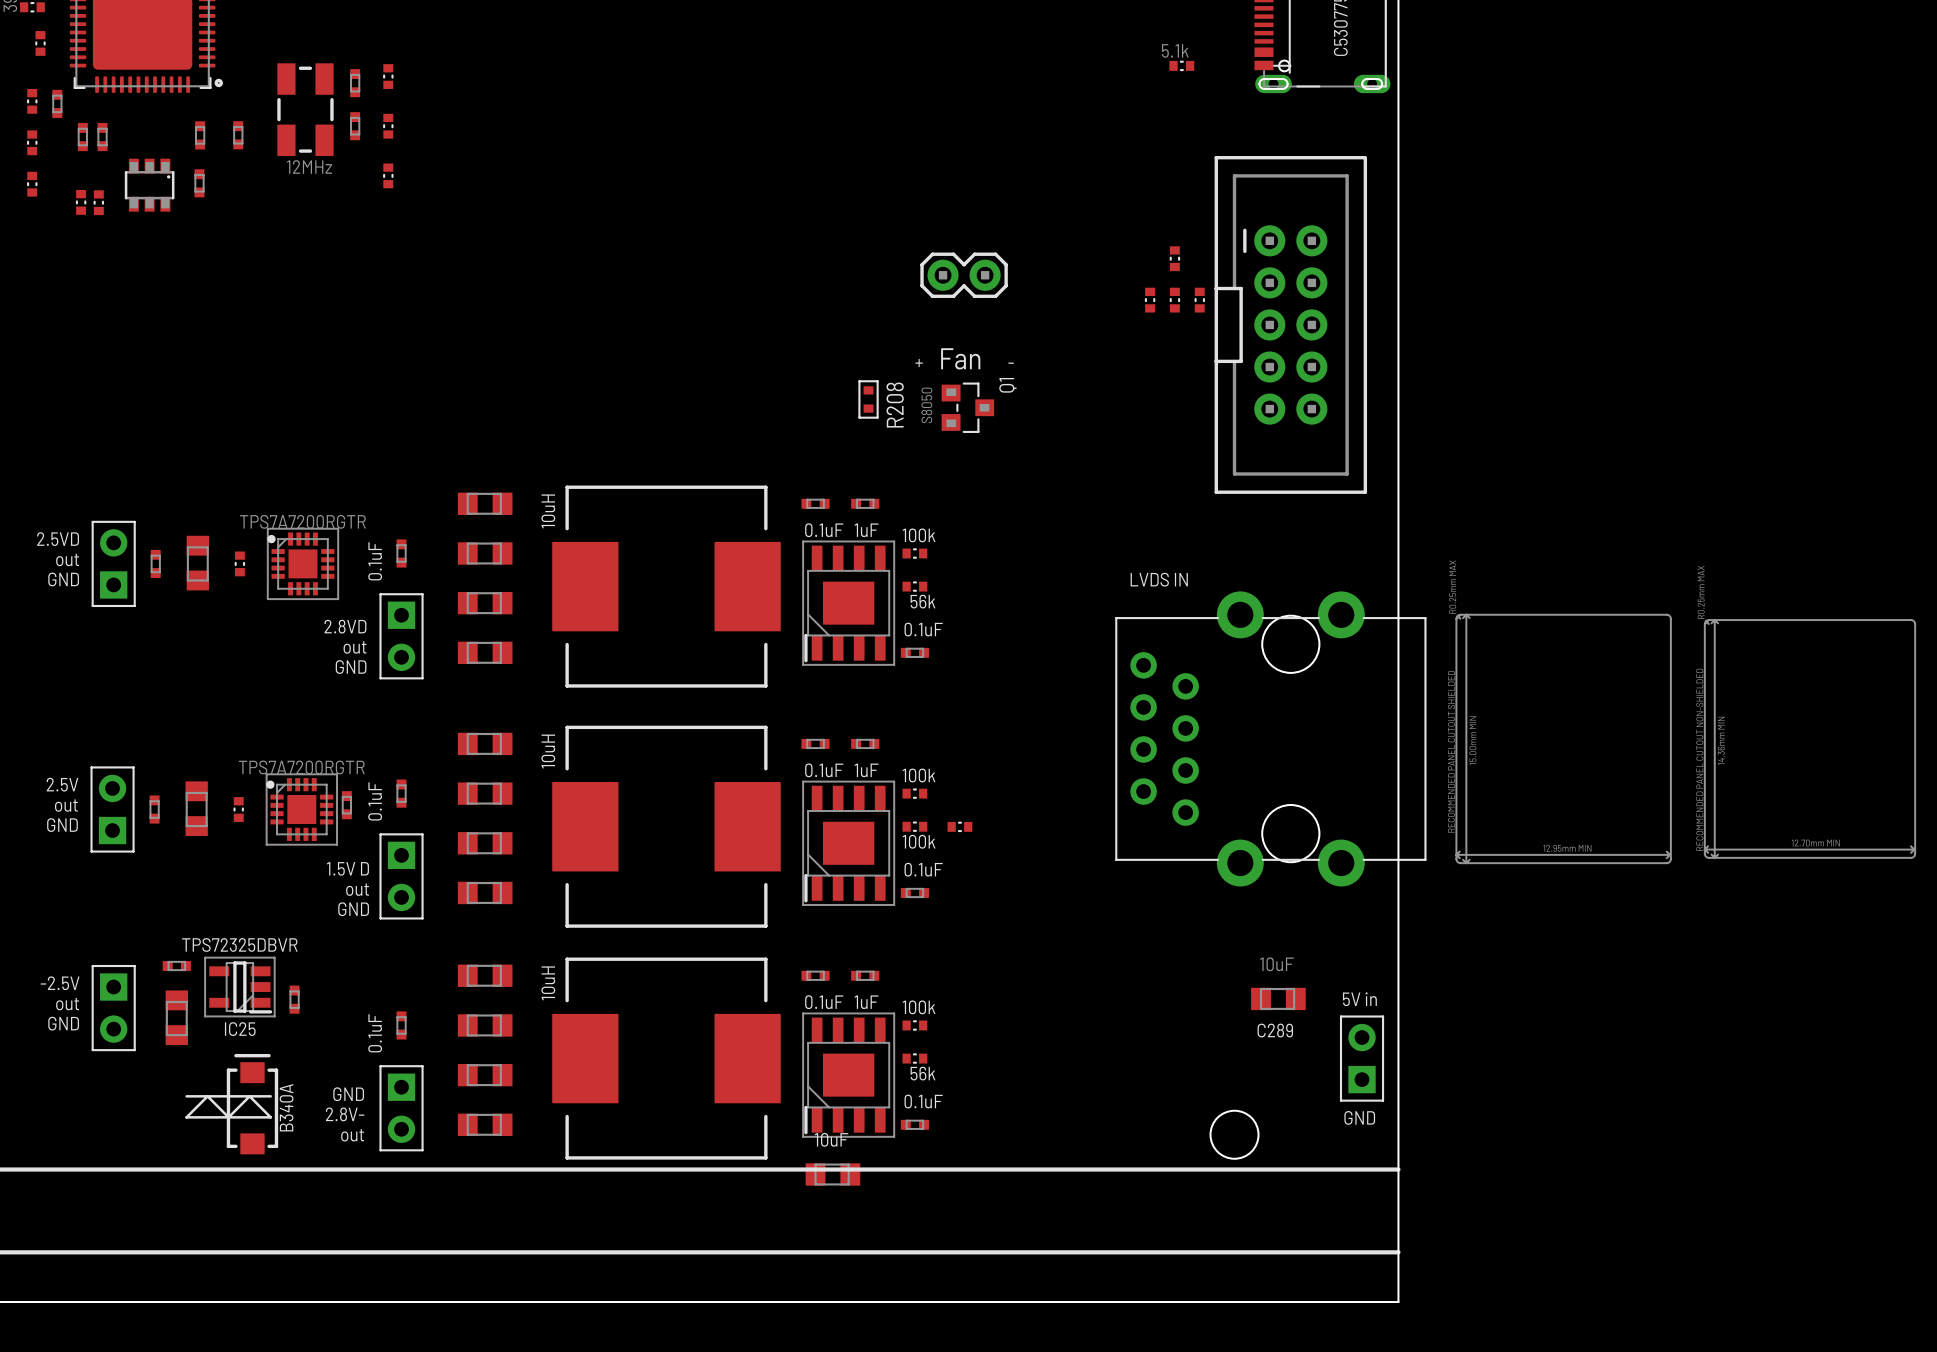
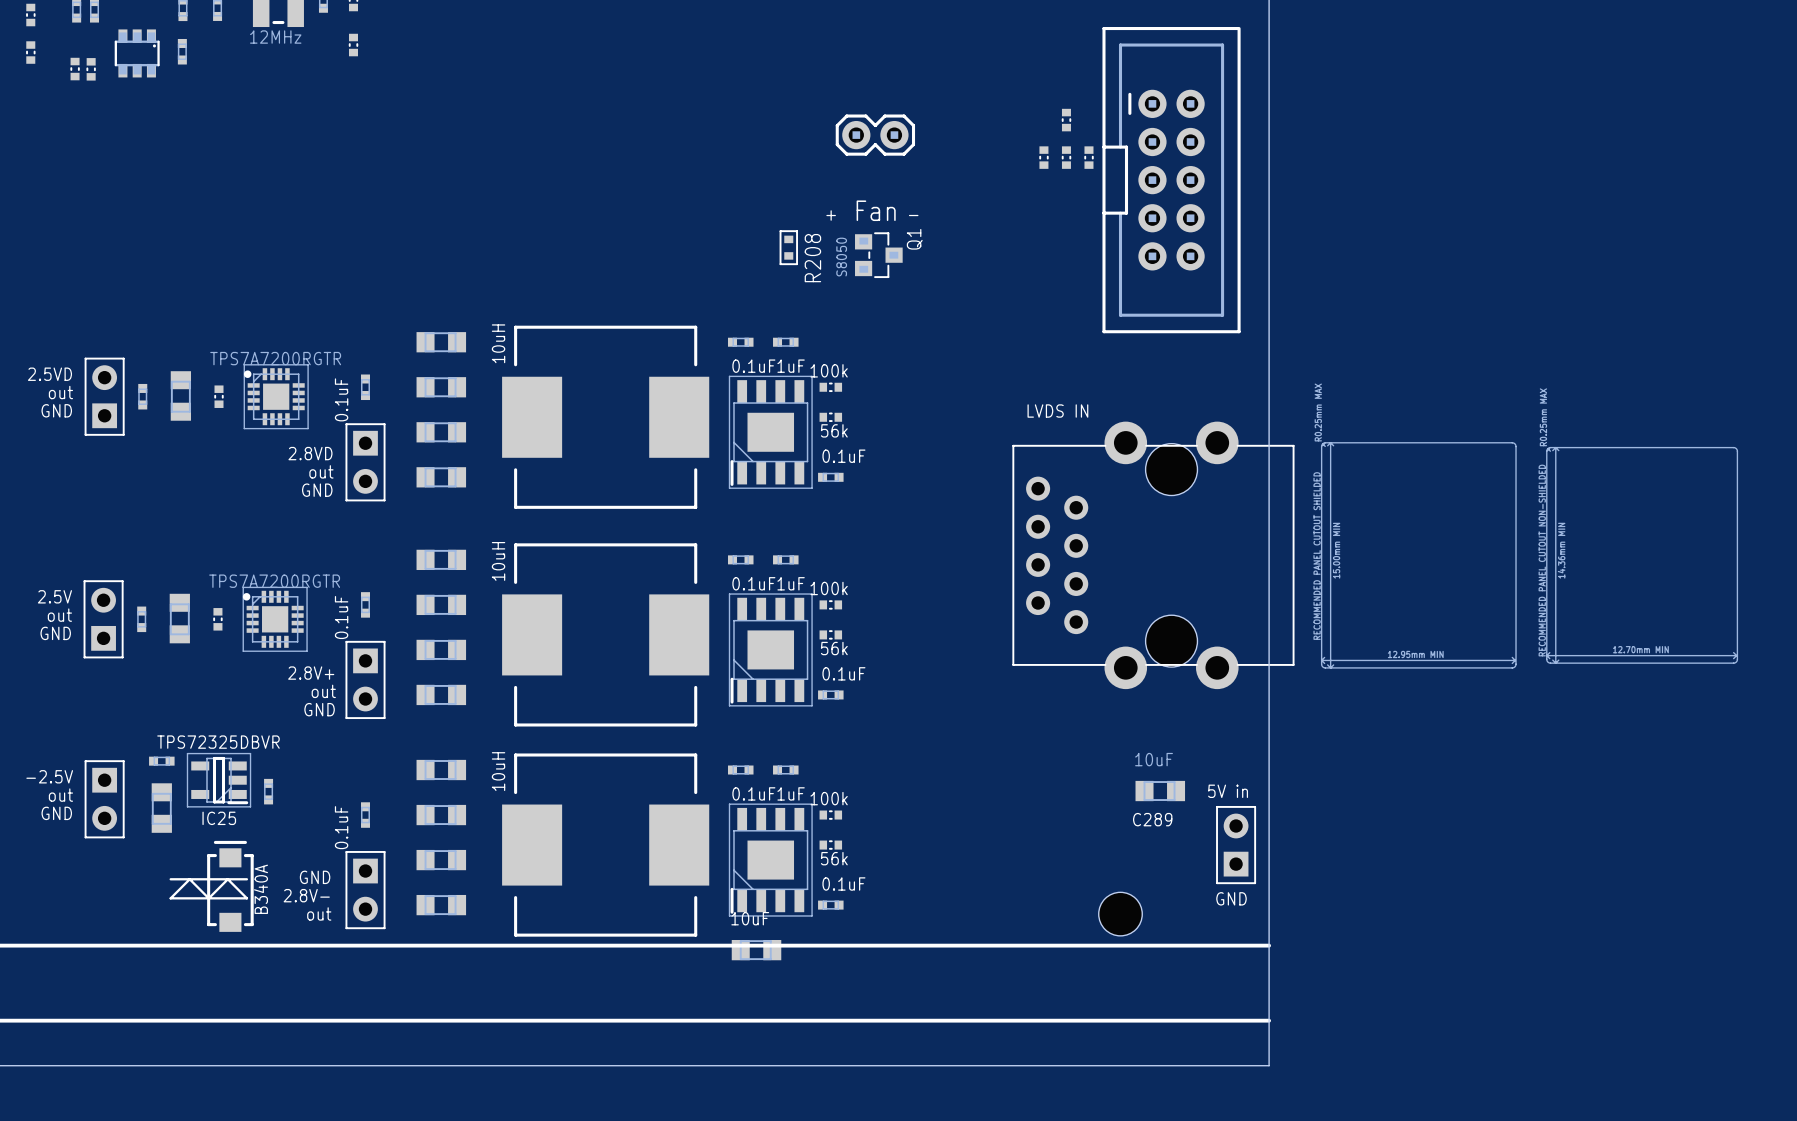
part: (346, 805) -> none
part: (959, 826) -> none
part value: 100k (919, 841) -> 56k (834, 648)
text: 1.5V D (347, 868) -> 2.8V+ (311, 673)

